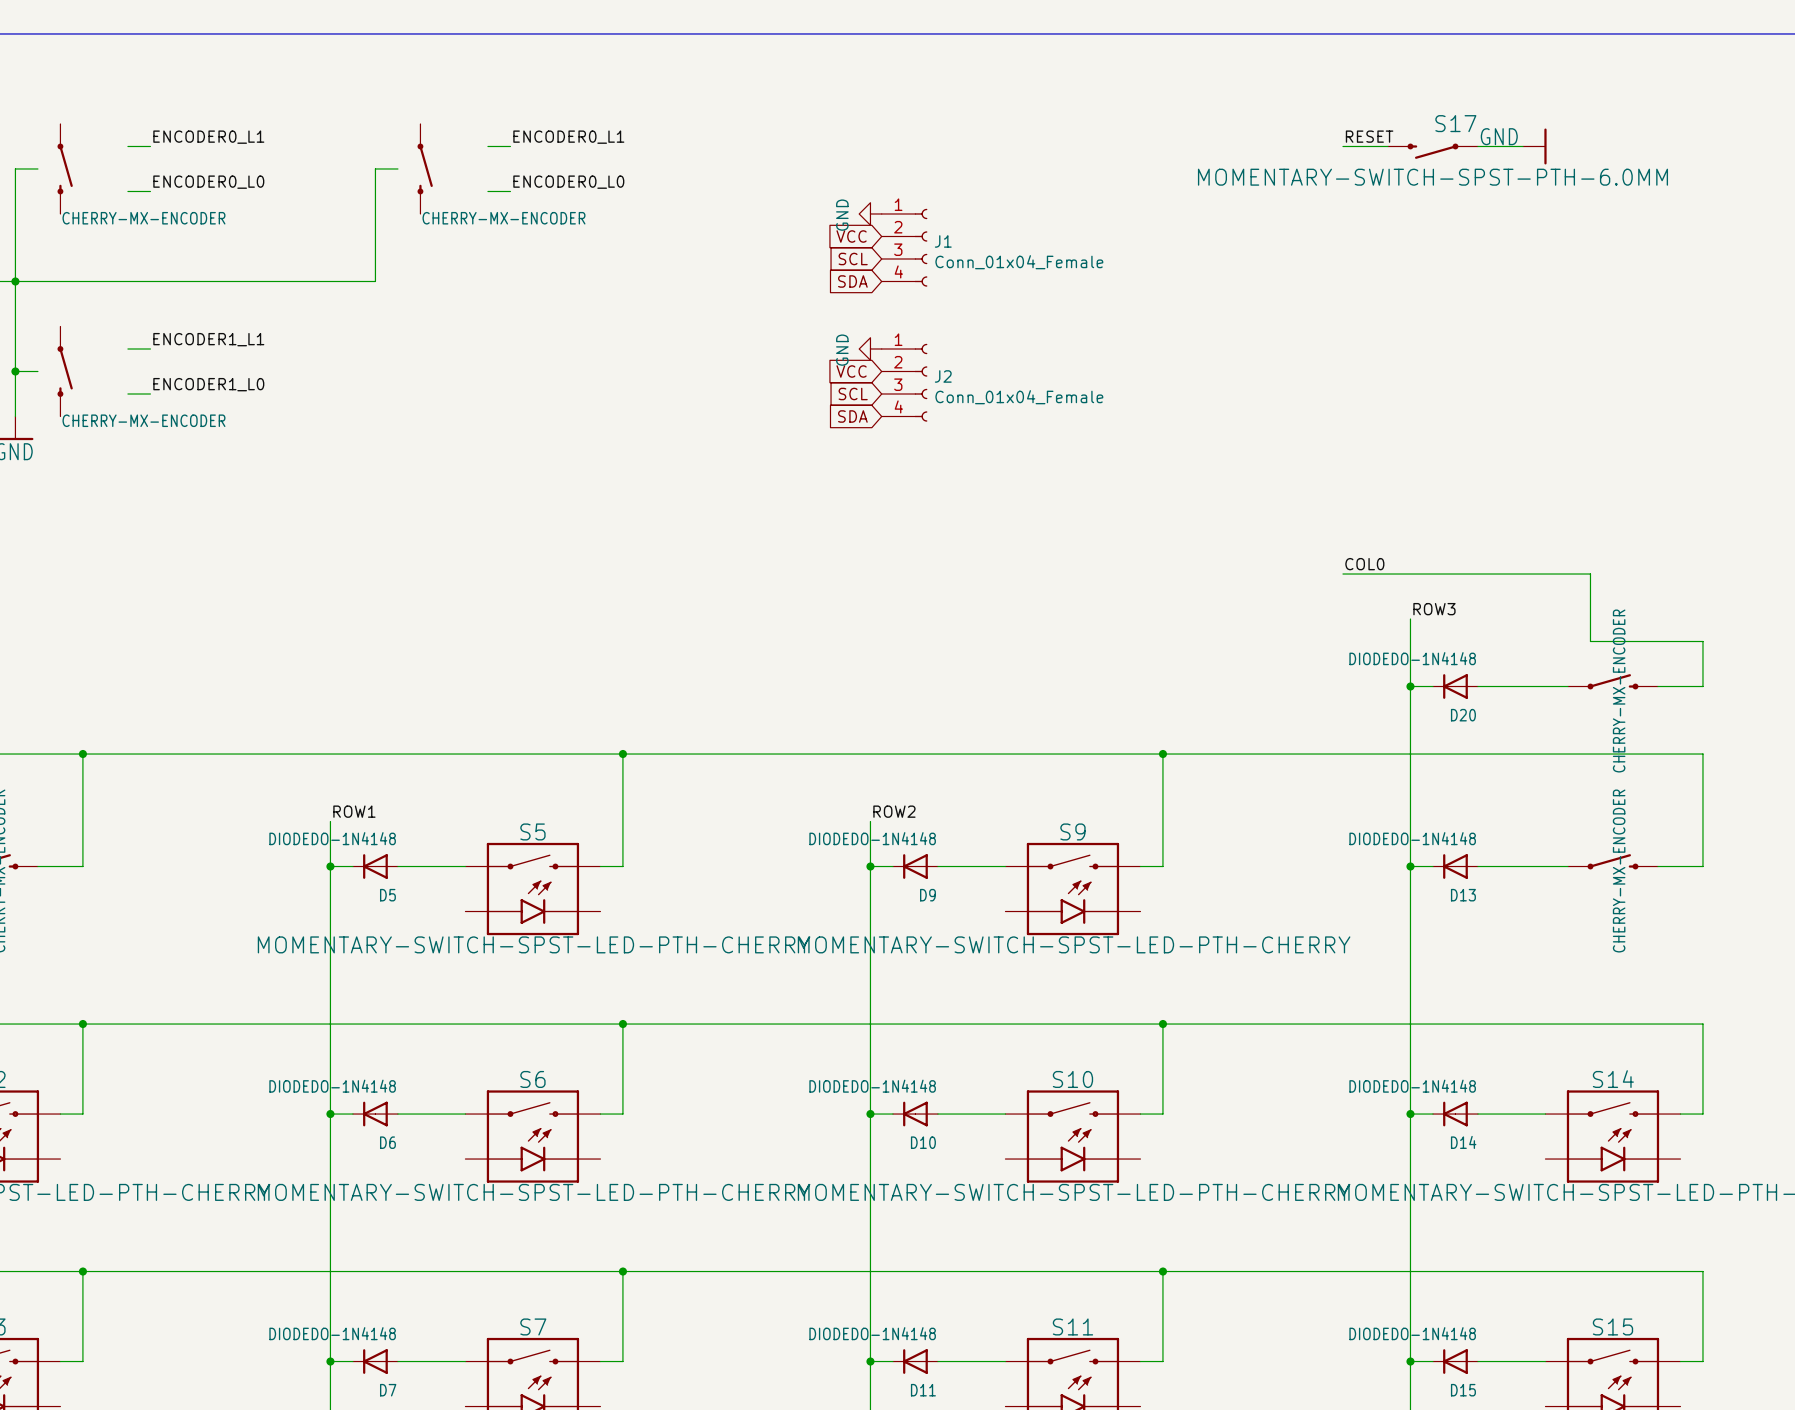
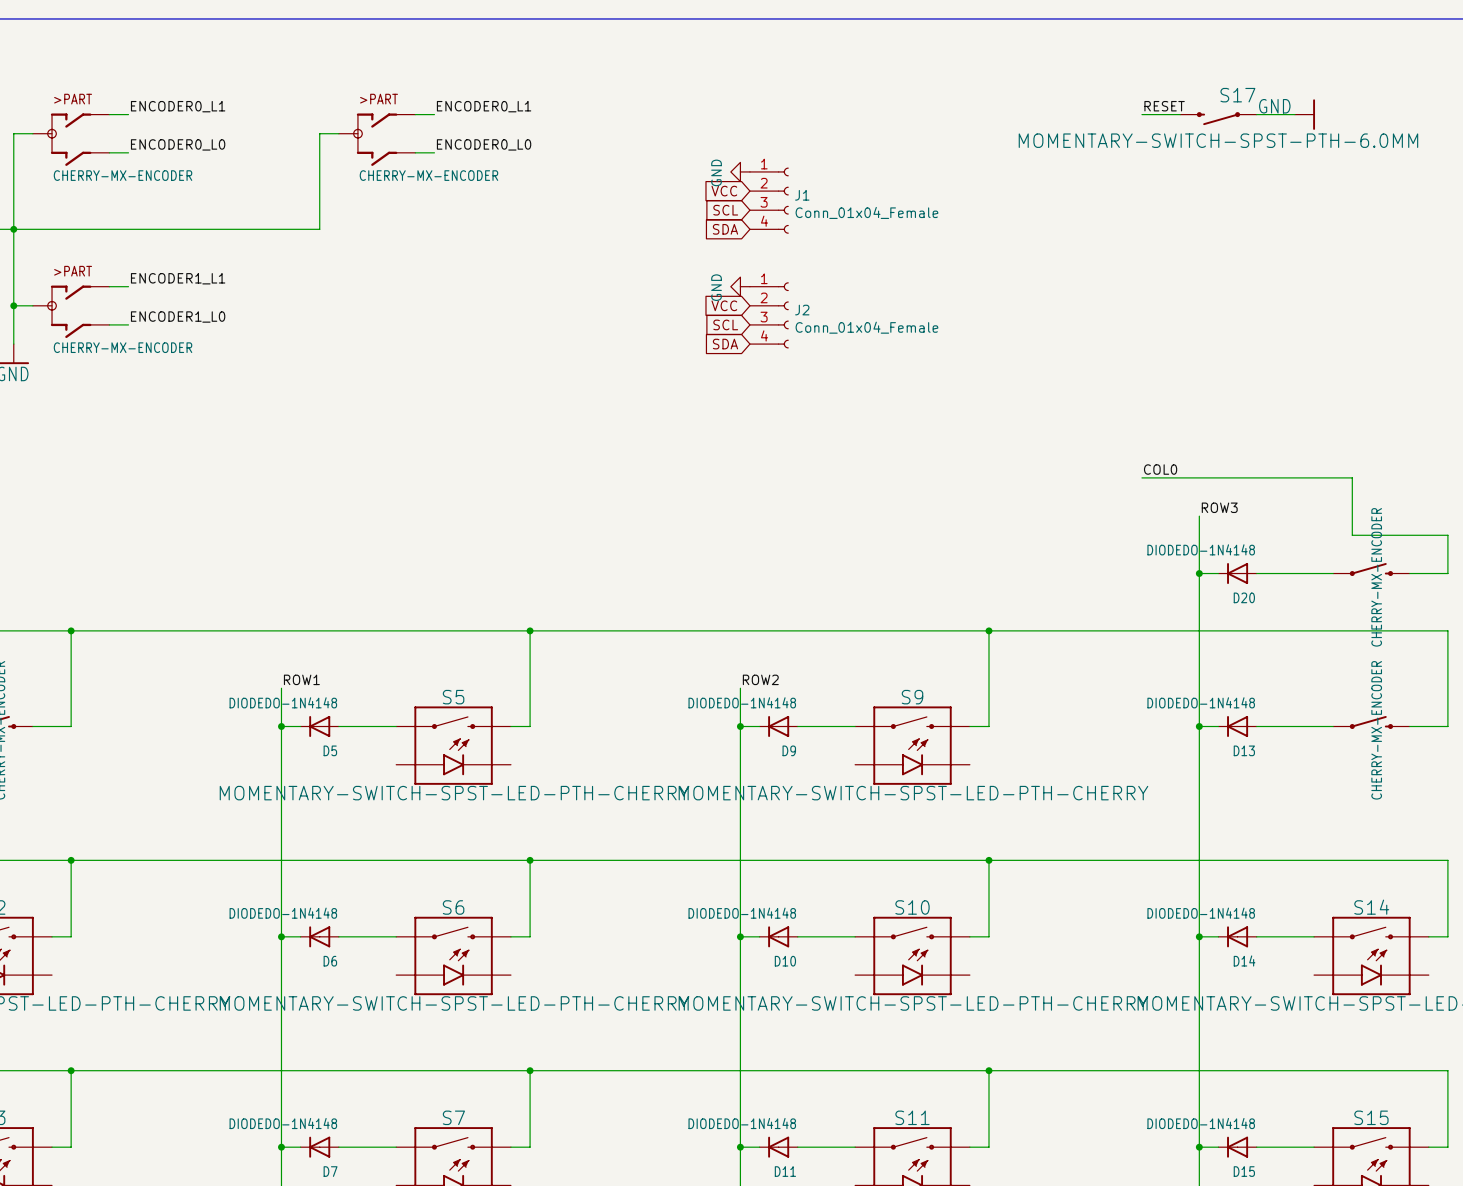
part: CHERRY-MX-ENCODER (65, 168) -> none
part: CHERRY-MX-ENCODER (425, 168) -> none
part: none -> CHERRY-MX-ENCODER (71, 139)
part: none -> CHERRY-MX-ENCODER (377, 139)
part: CHERRY-MX-ENCODER (65, 371) -> none
part: none -> CHERRY-MX-ENCODER (71, 311)

